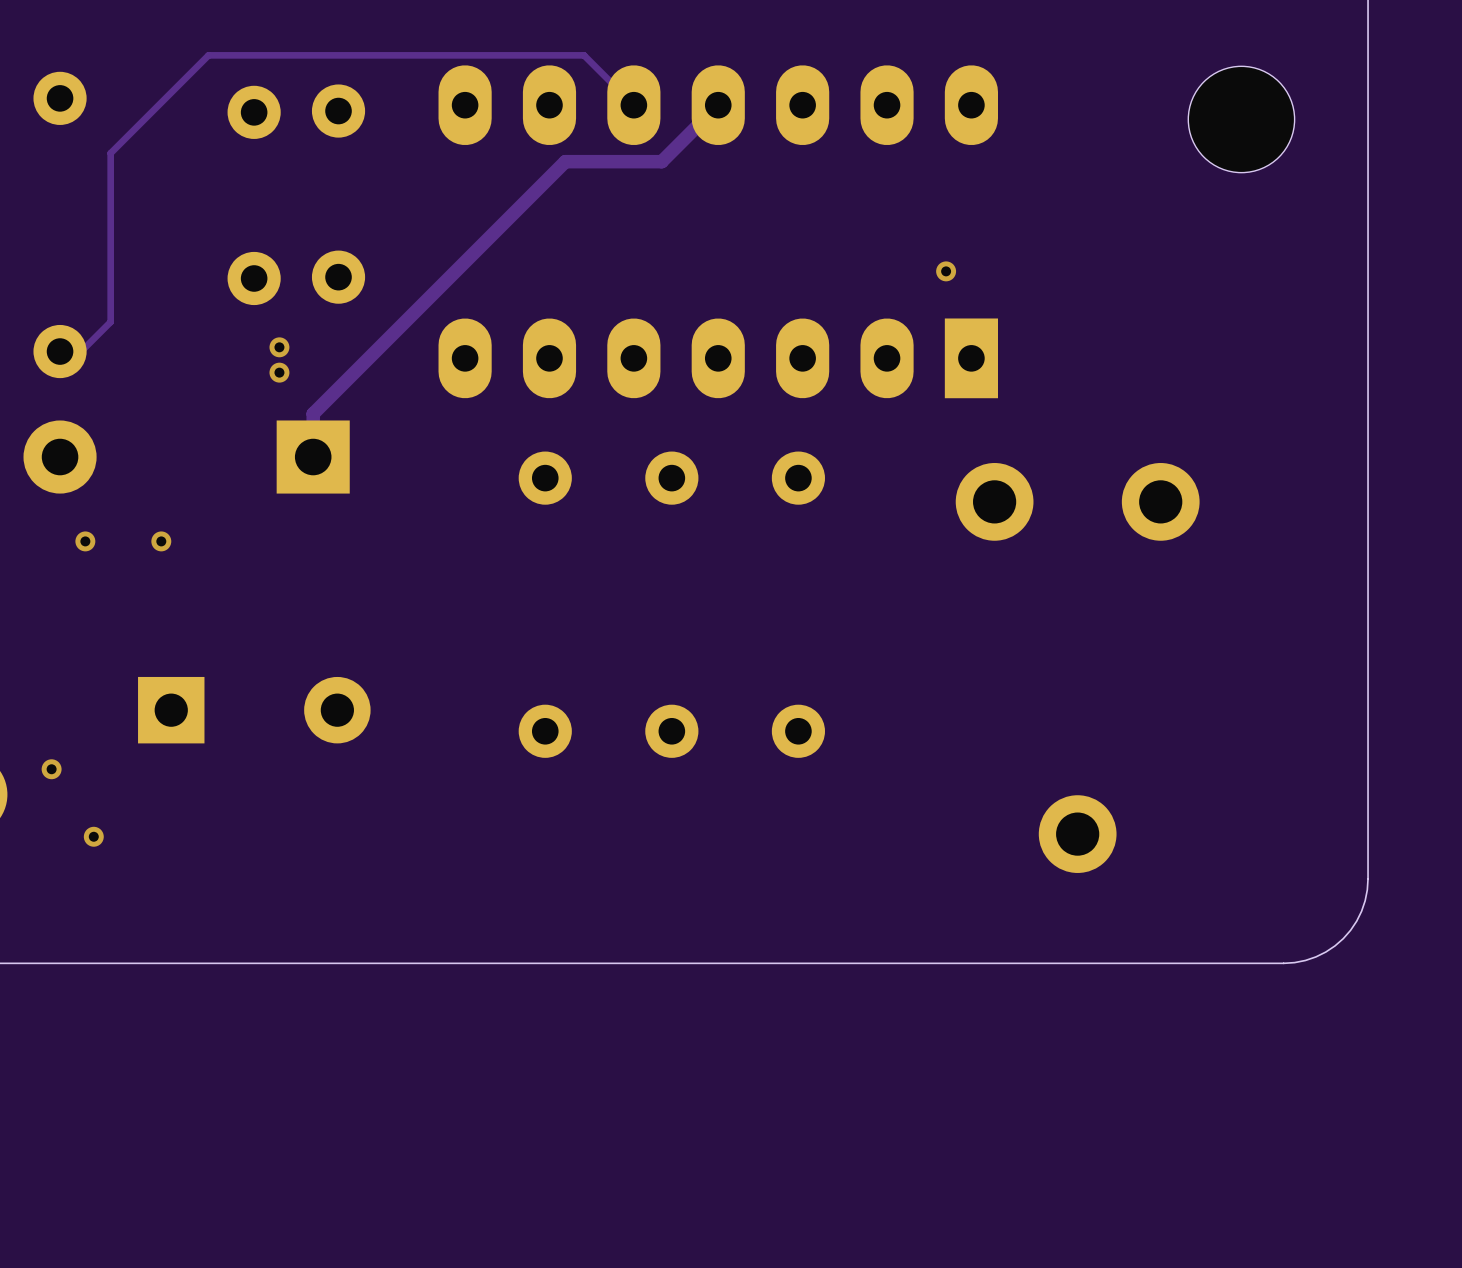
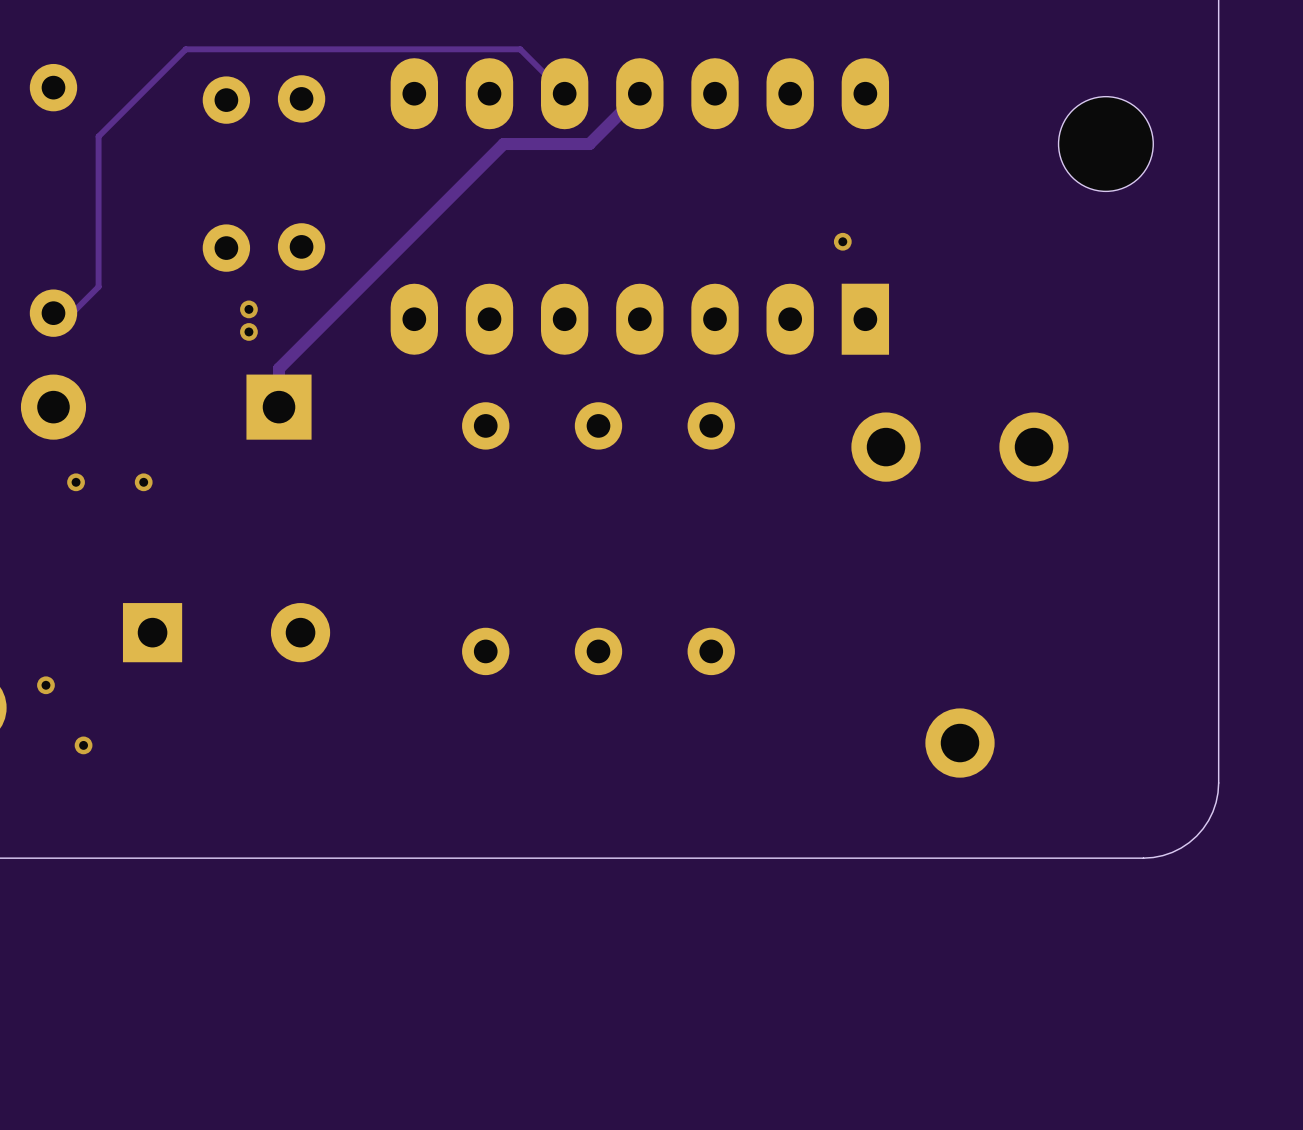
part position: (1241, 119) -> (1105, 144)

